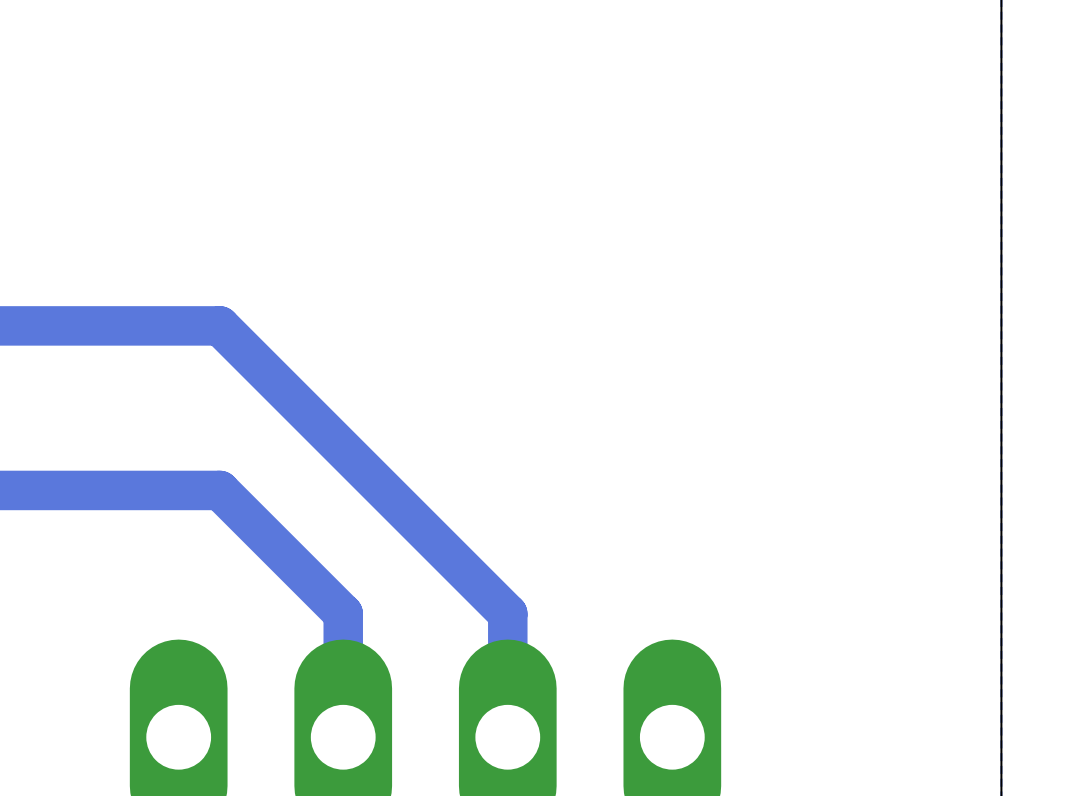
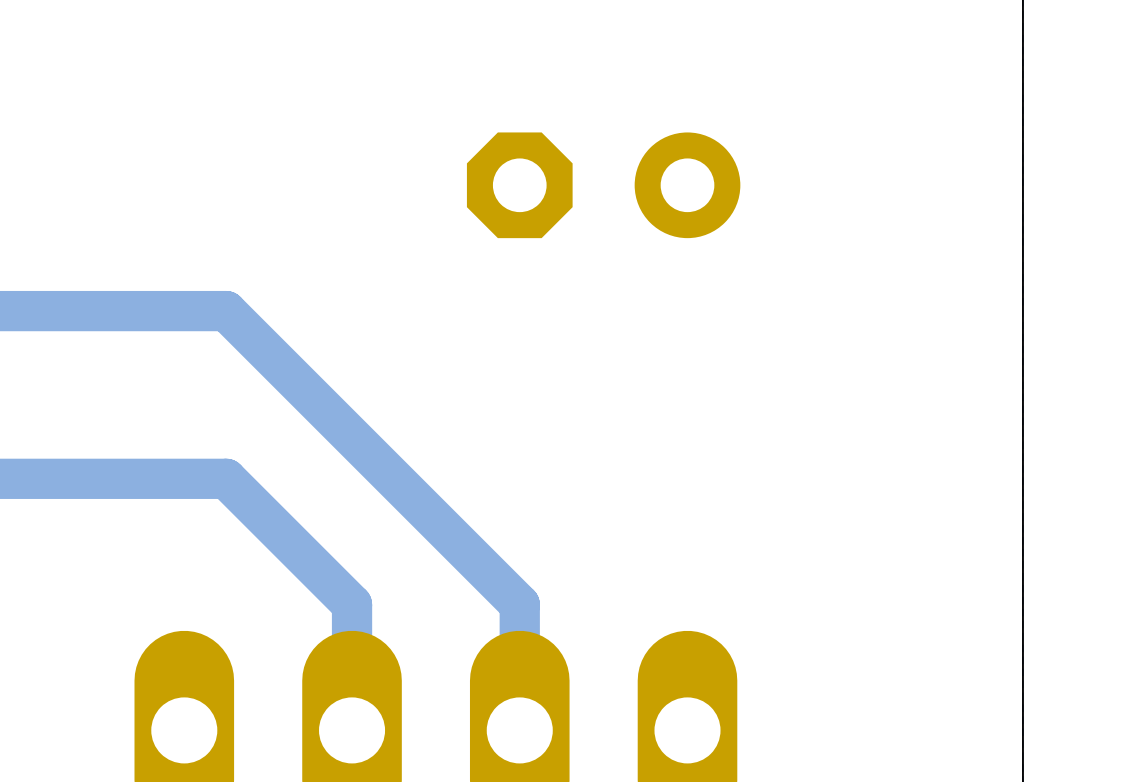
part: none -> (603, 185)

